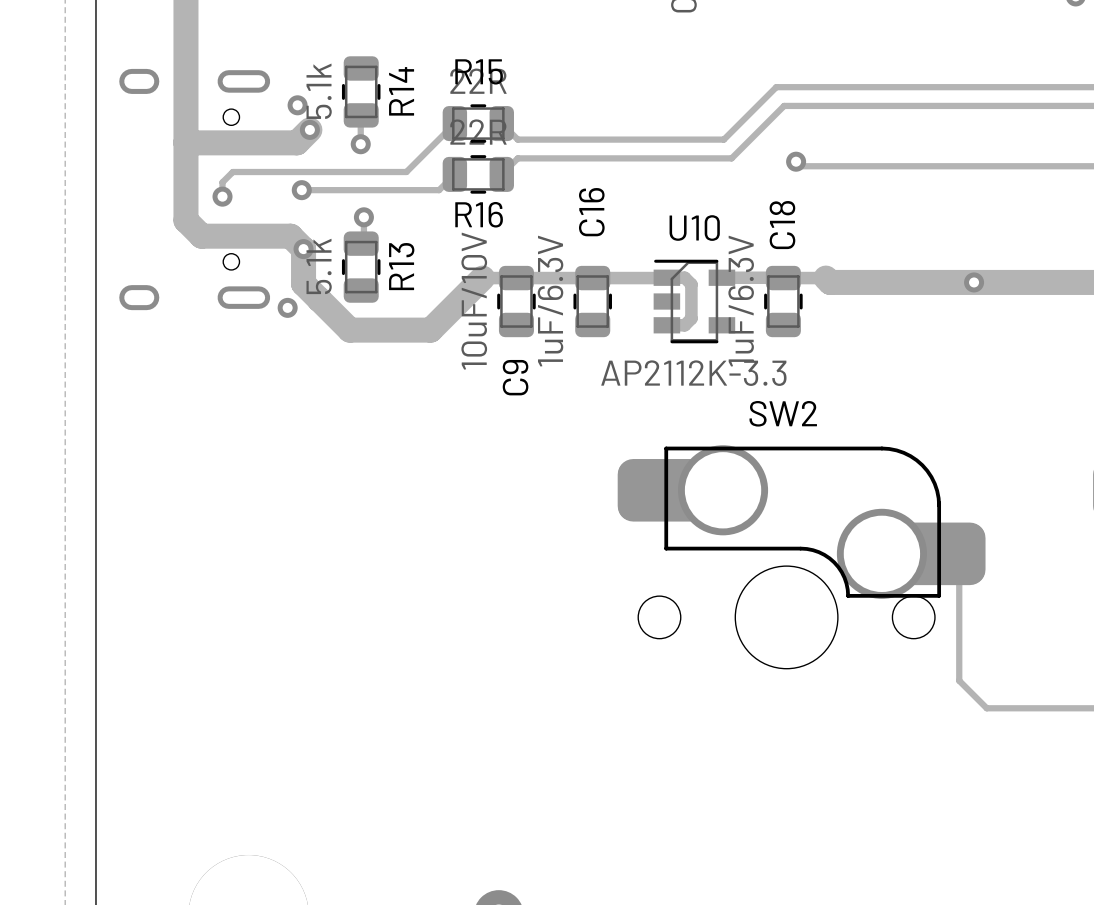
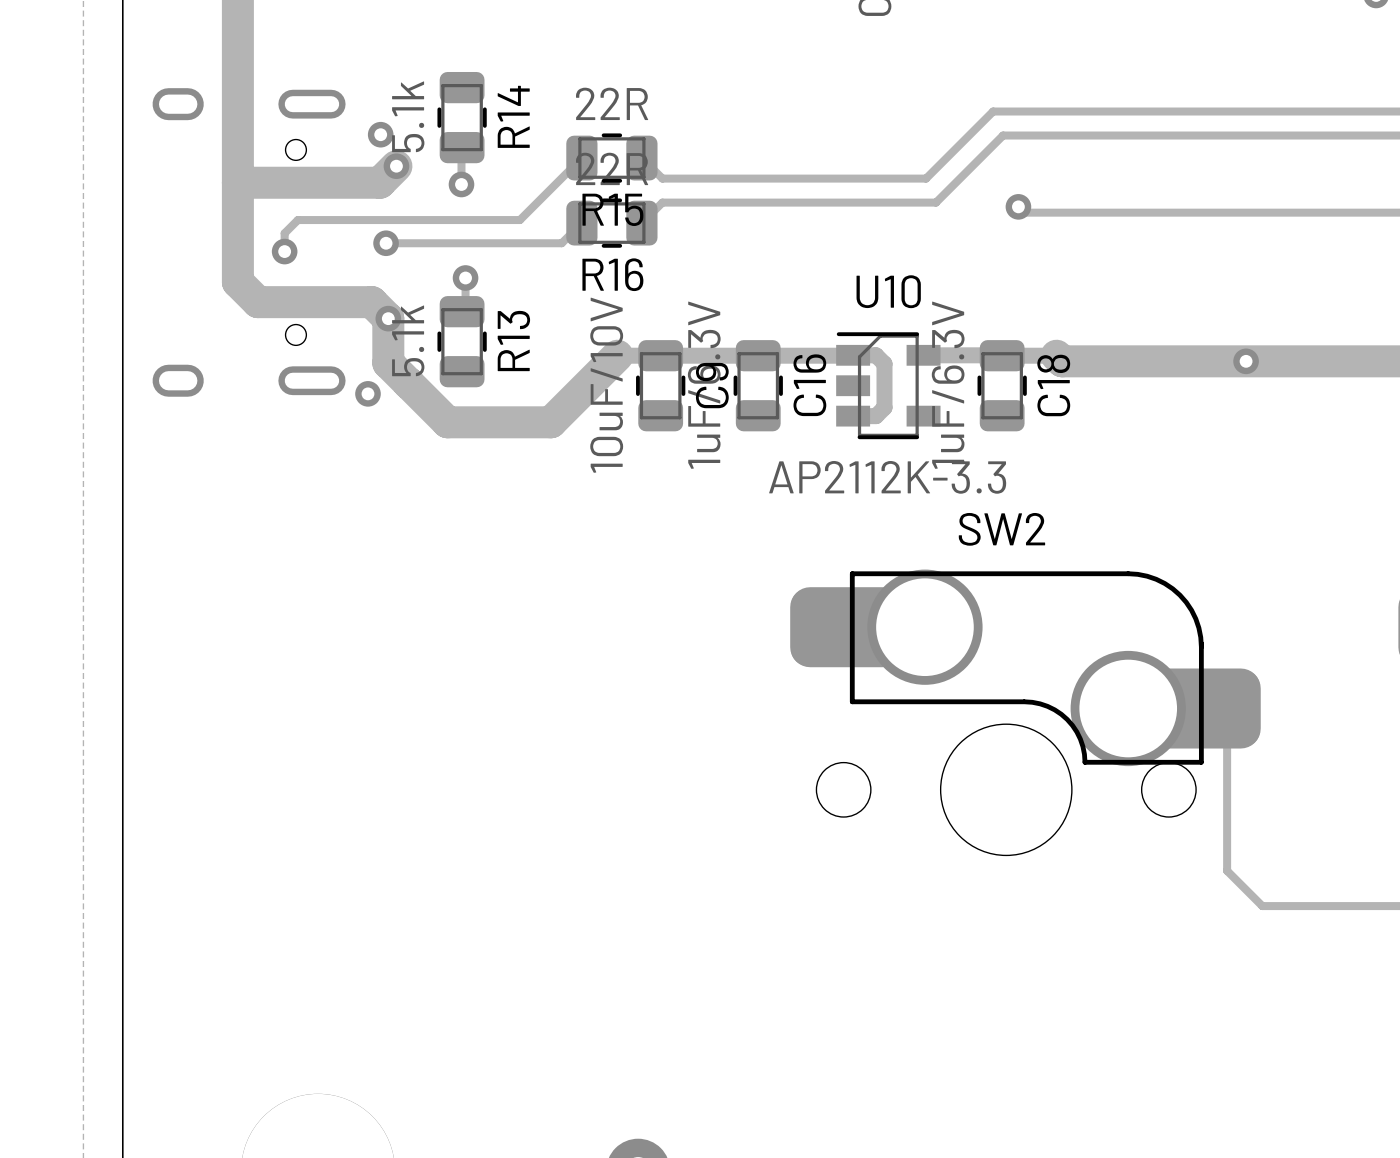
R15 name position: R15 (479, 71) -> R15 (612, 209)
C16 name position: C16 (591, 212) -> C16 (809, 385)
C18 name position: C18 (782, 225) -> C18 (1053, 385)
C9 name position: C9 (515, 377) -> C9 (712, 385)

